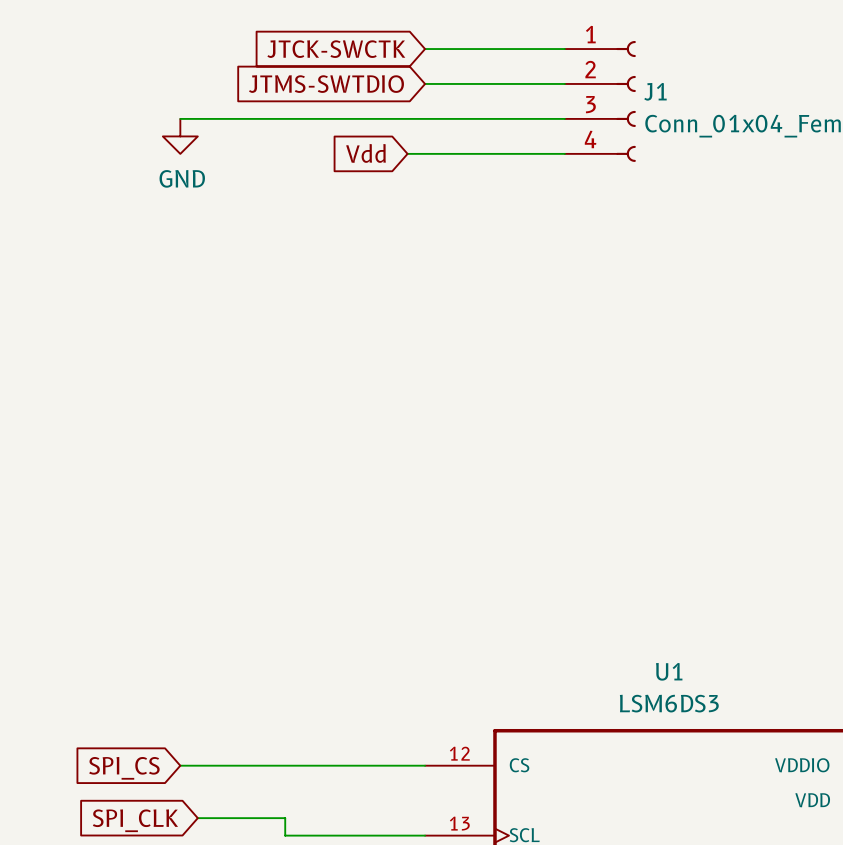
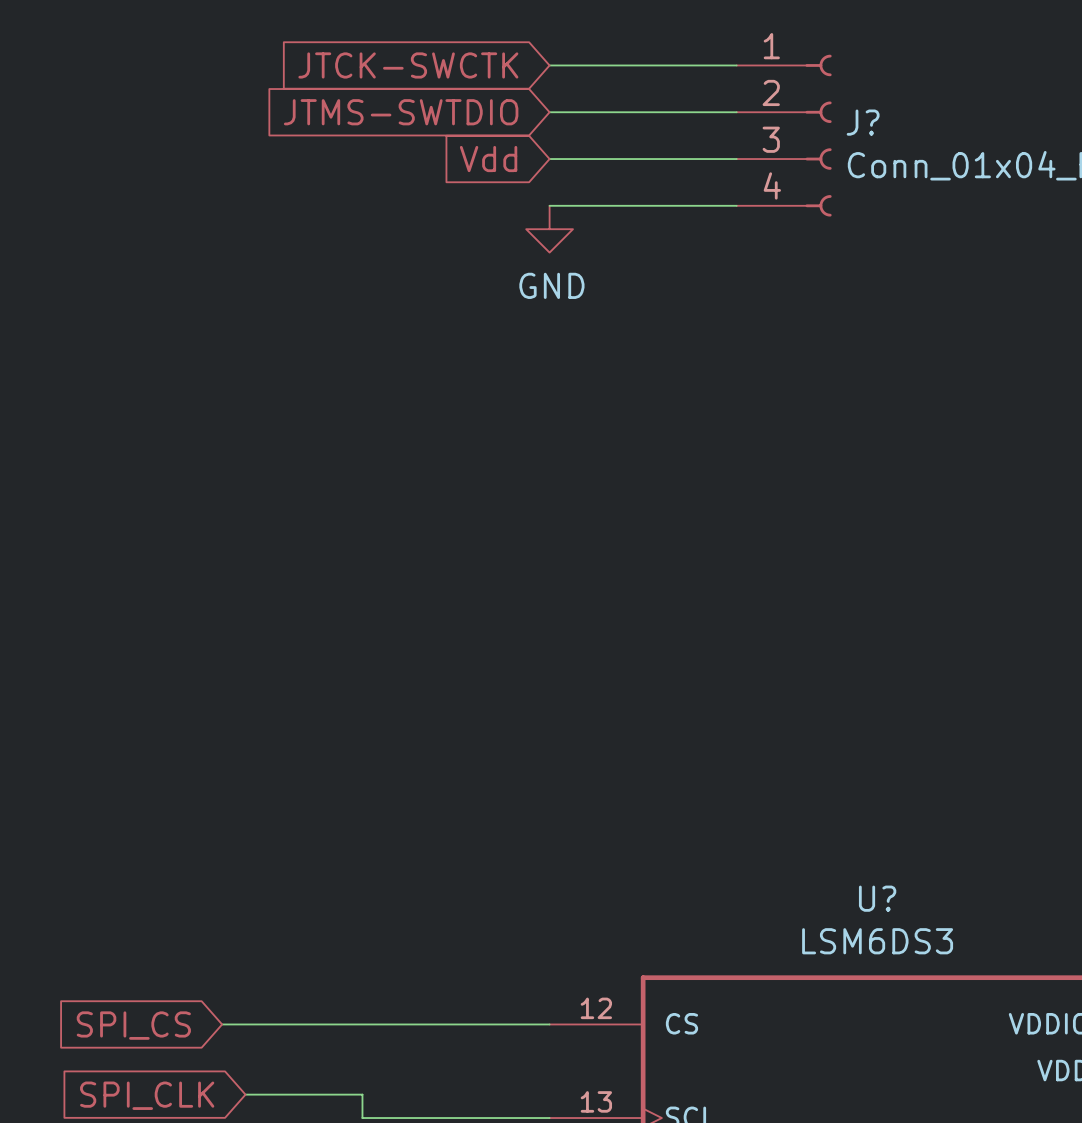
J1 name: J1 (655, 91) -> J? (863, 122)
wire: (180, 118) (425, 118) -> none
power symbol position: GND (180, 136) -> GND (549, 229)
global label position: Vdd (365, 153) -> Vdd (488, 159)
wire: (407, 153) (425, 153) -> none
U1 name: U1 (669, 671) -> U? (877, 898)

